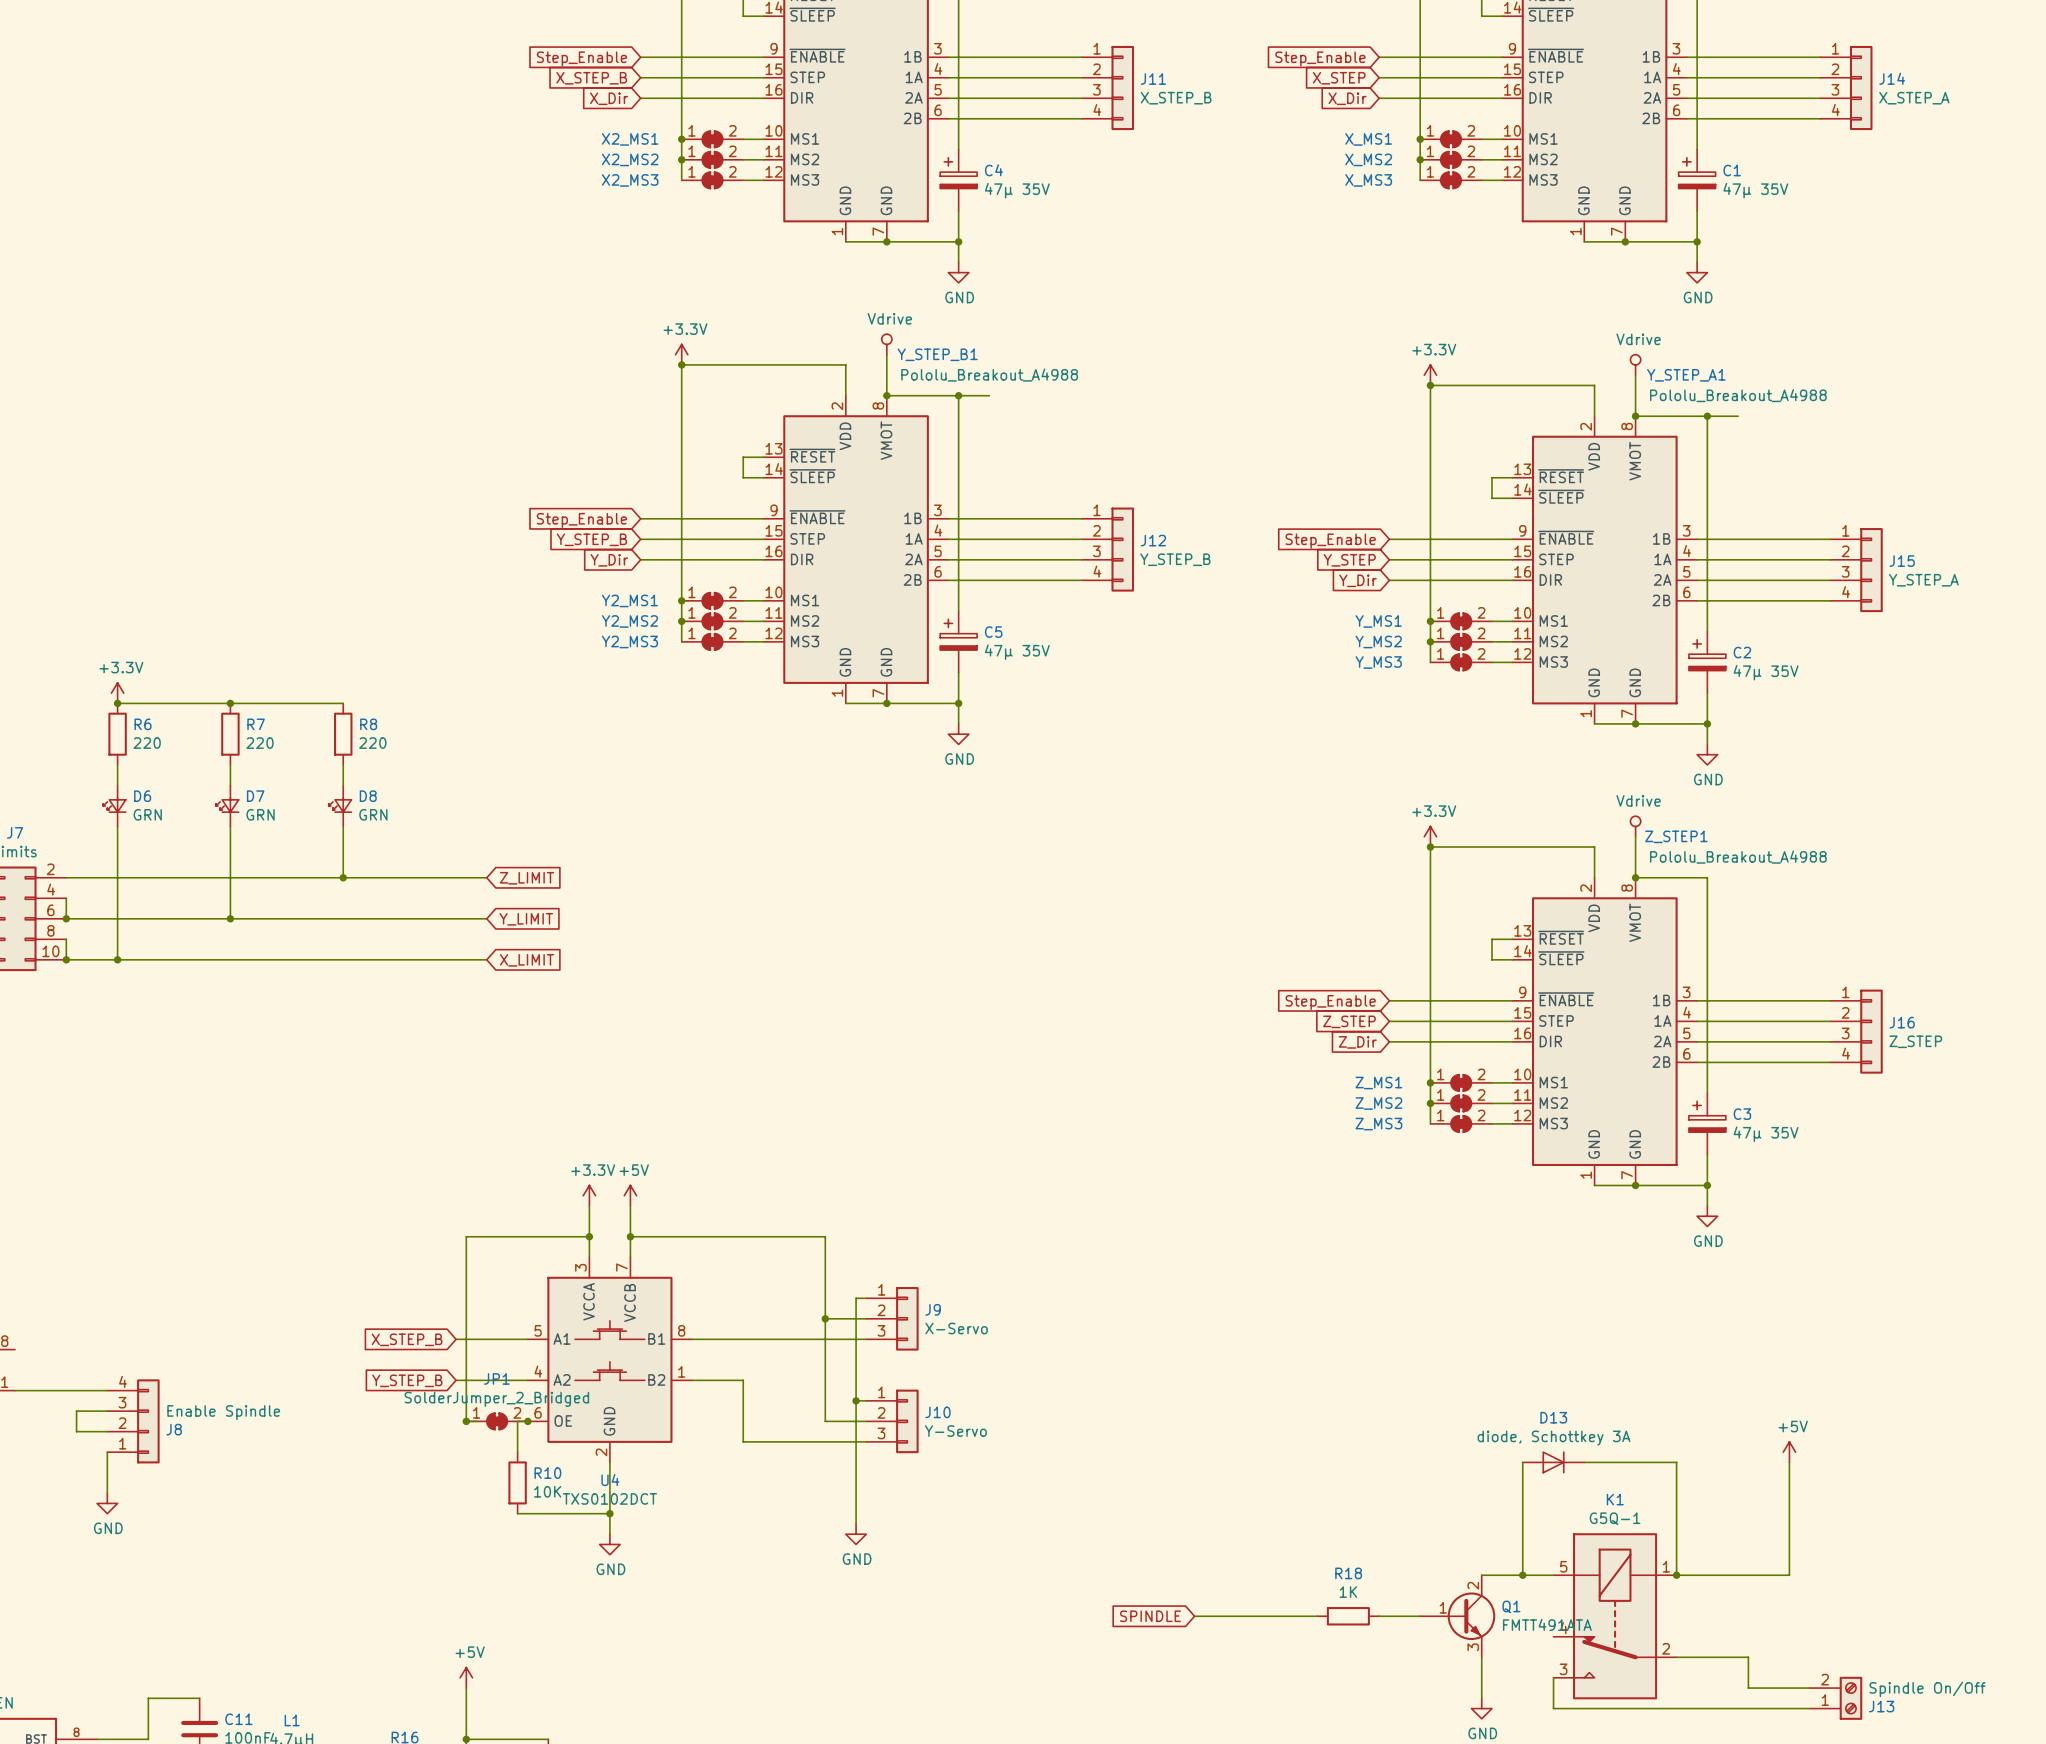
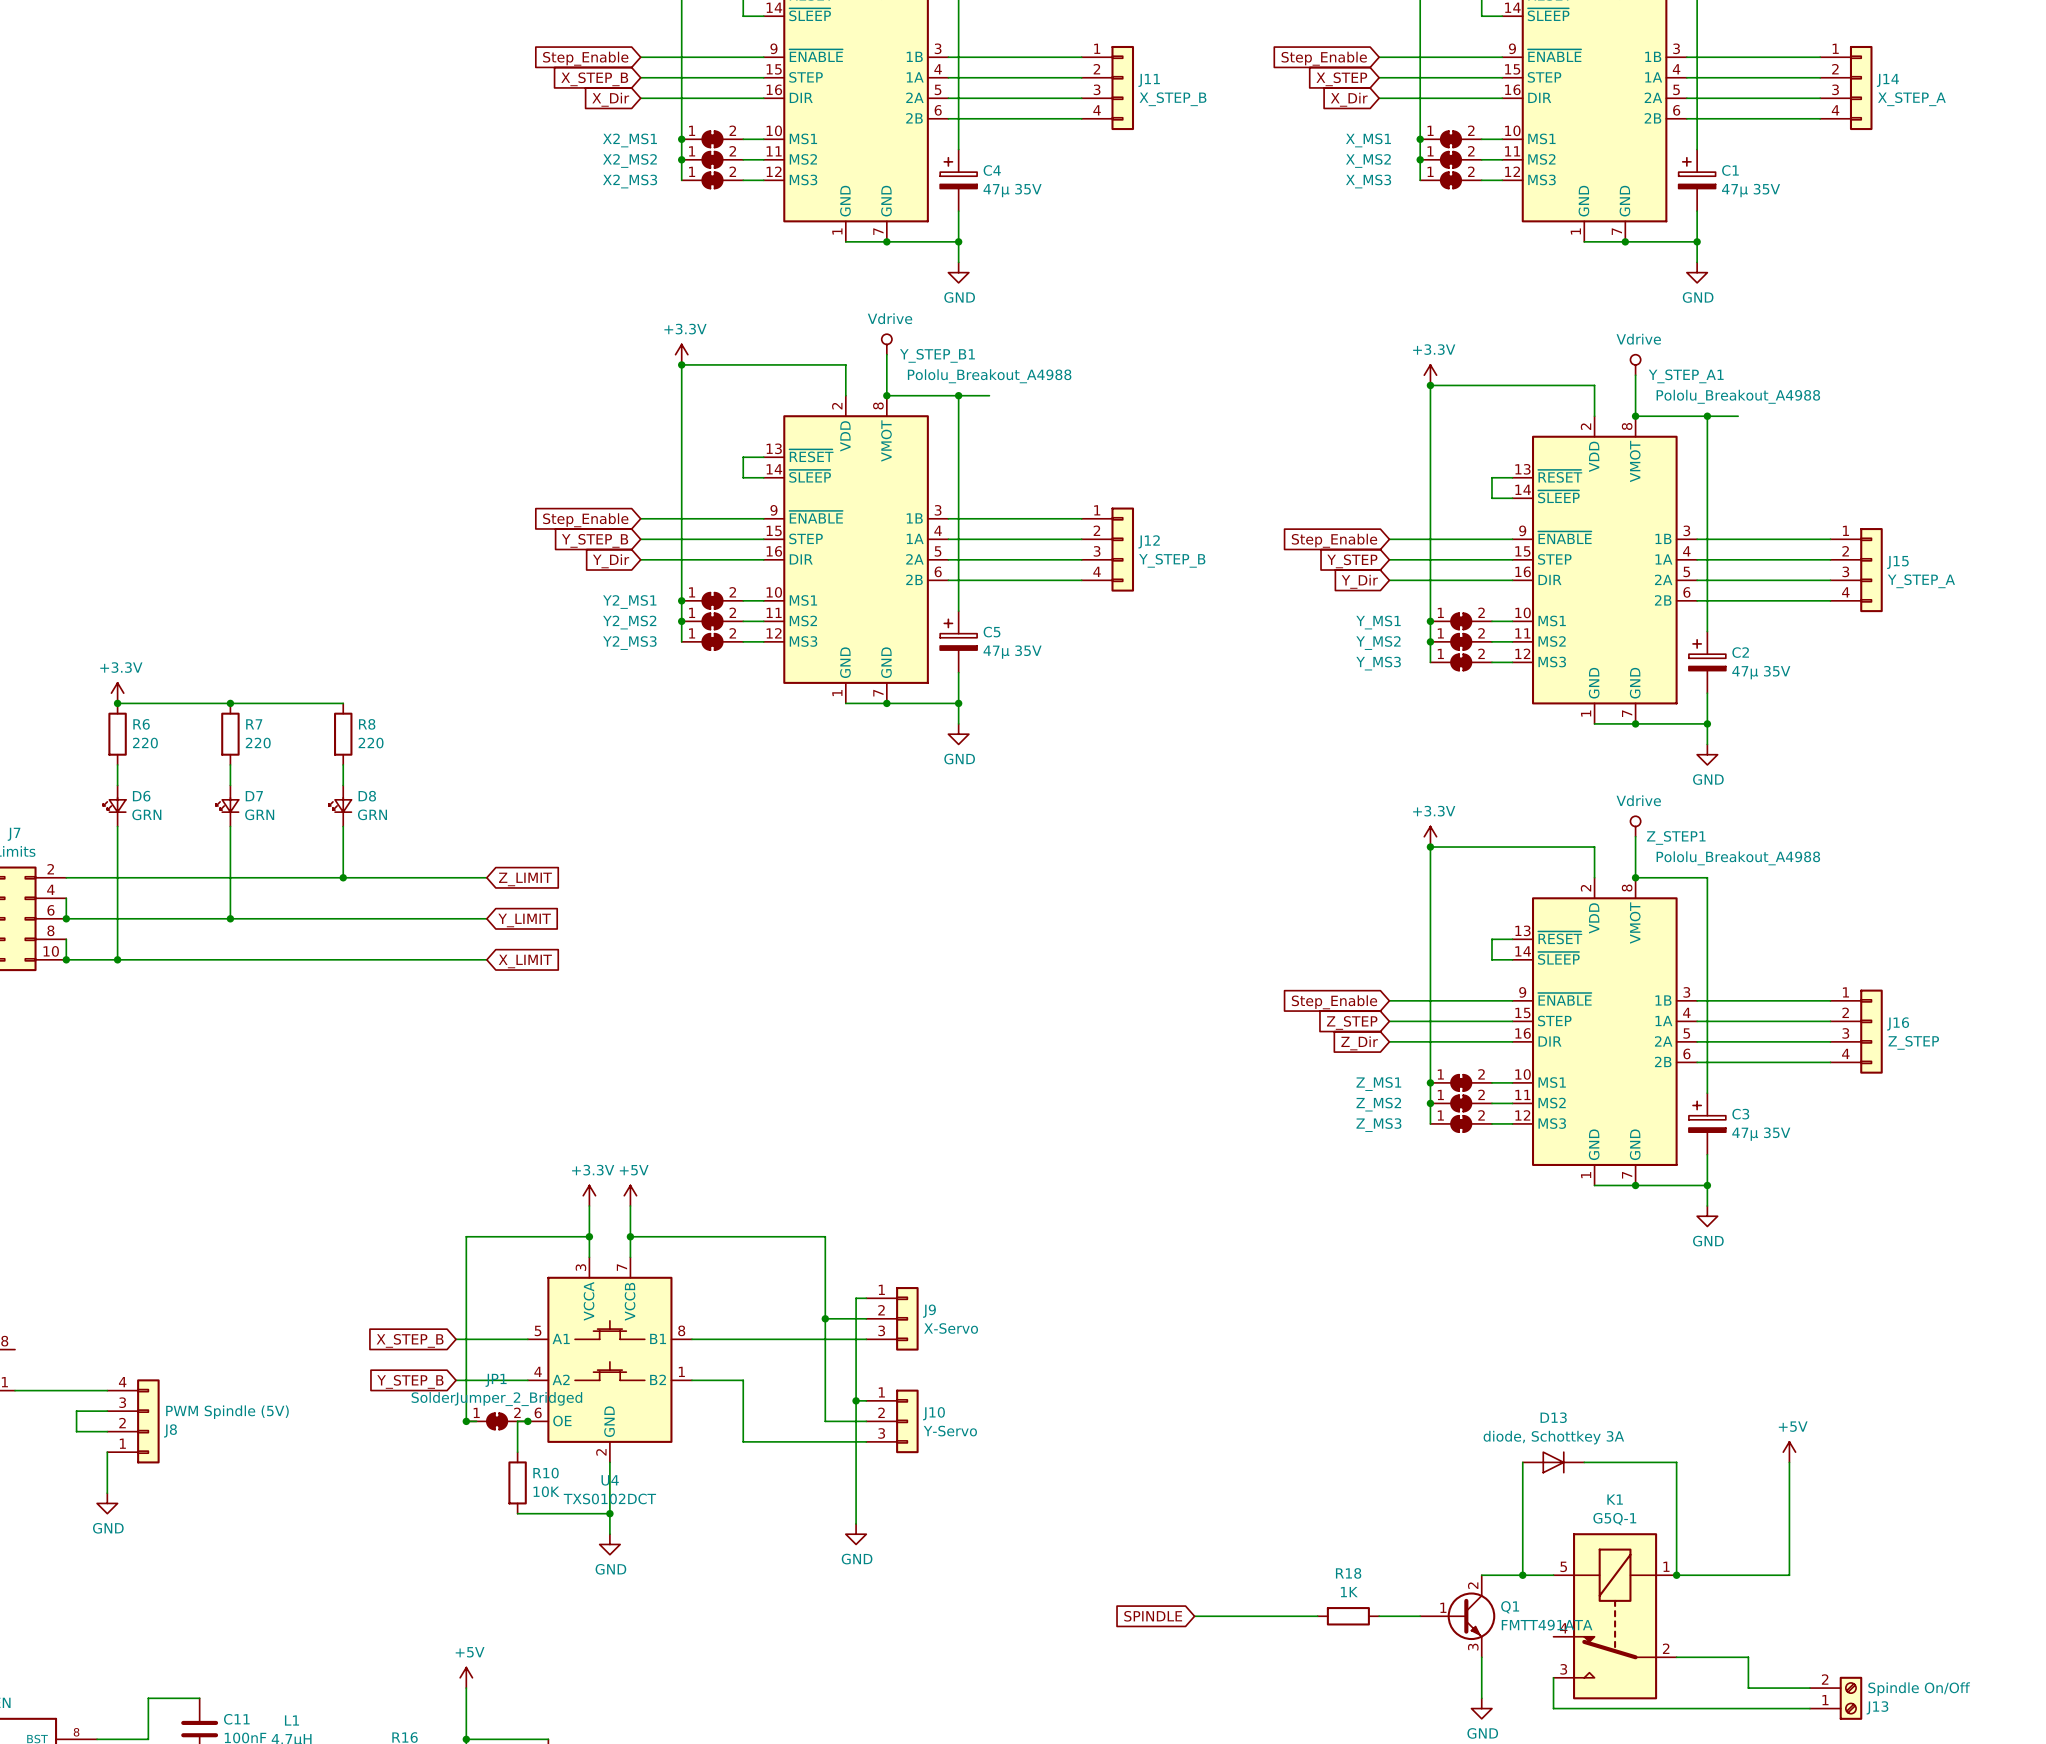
J8 value: Enable Spindle (223, 1412) -> PWM Spindle (5V) (227, 1412)

